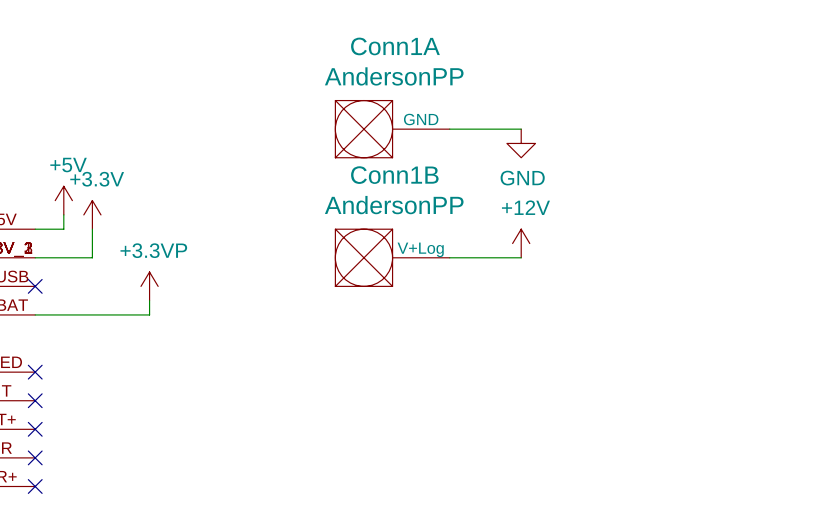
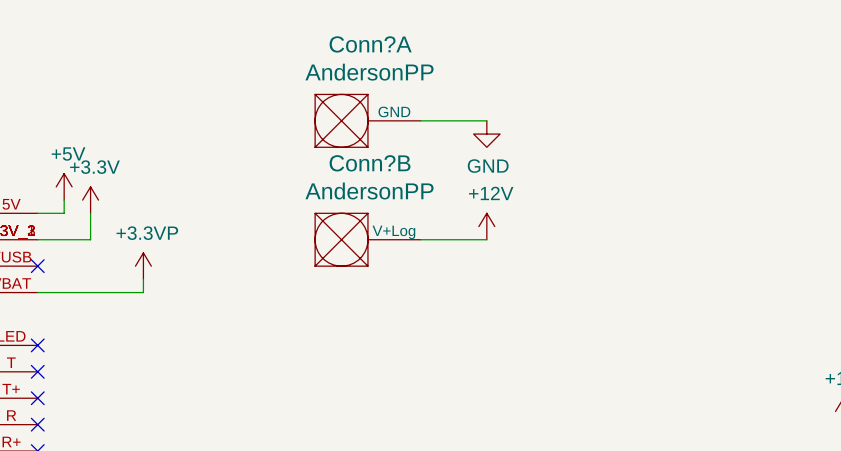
Conn1A name: Conn1A (395, 46) -> Conn?A (370, 44)
Conn1B name: Conn1B (394, 175) -> Conn?B (370, 163)

